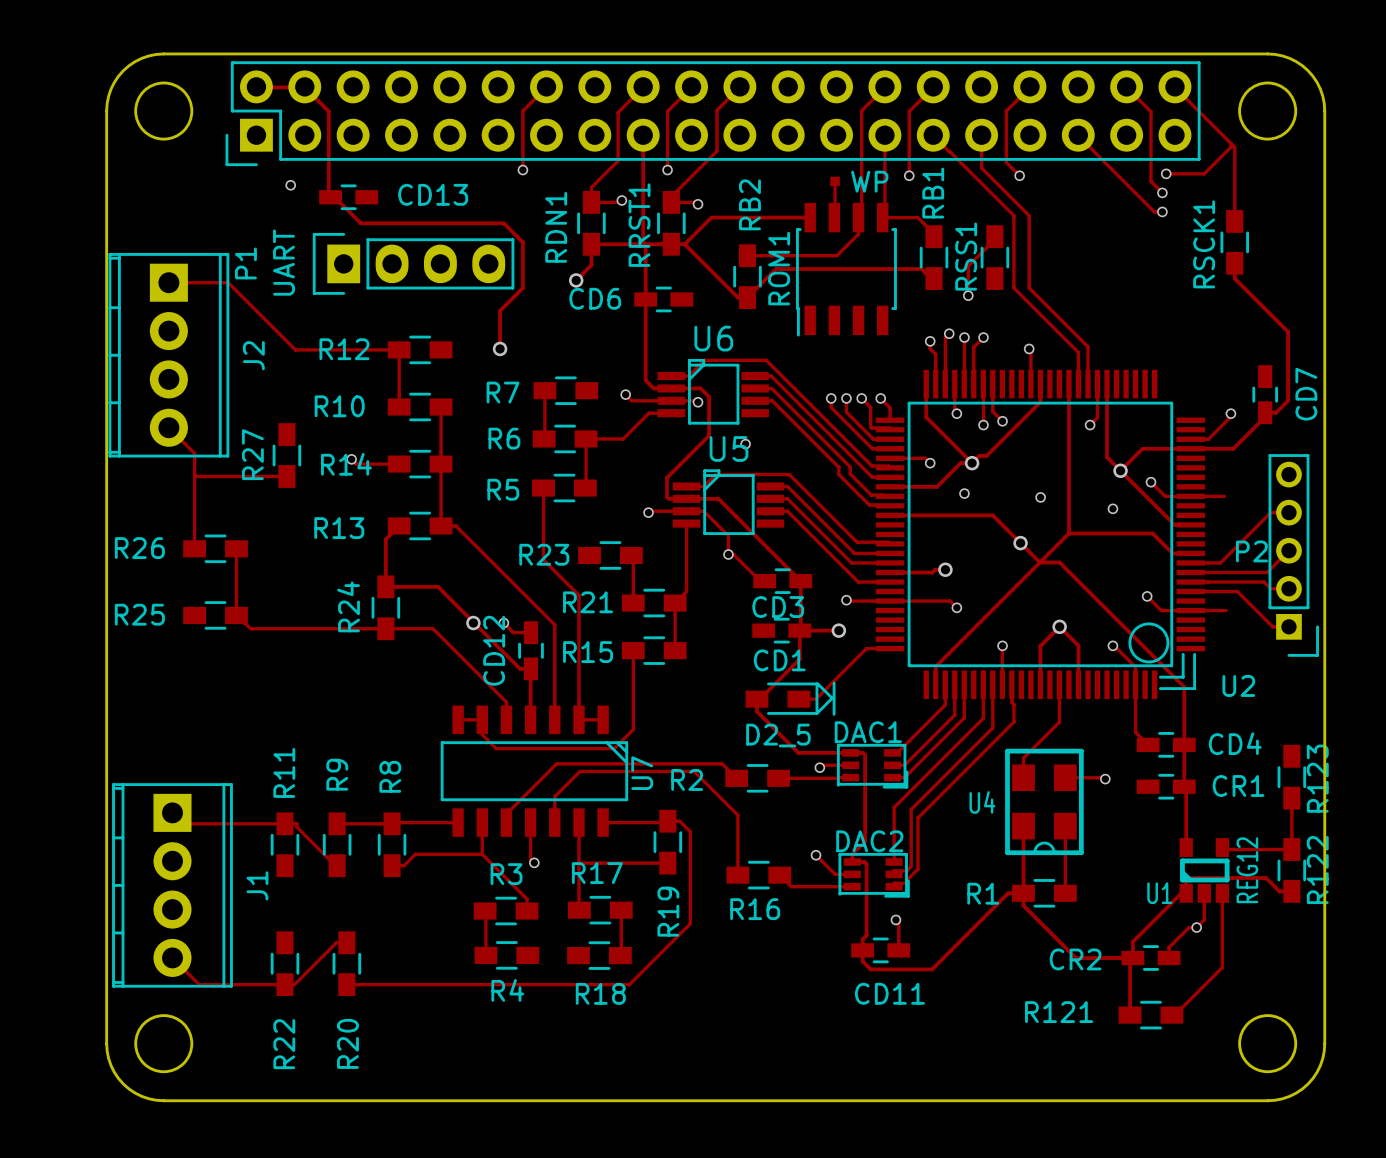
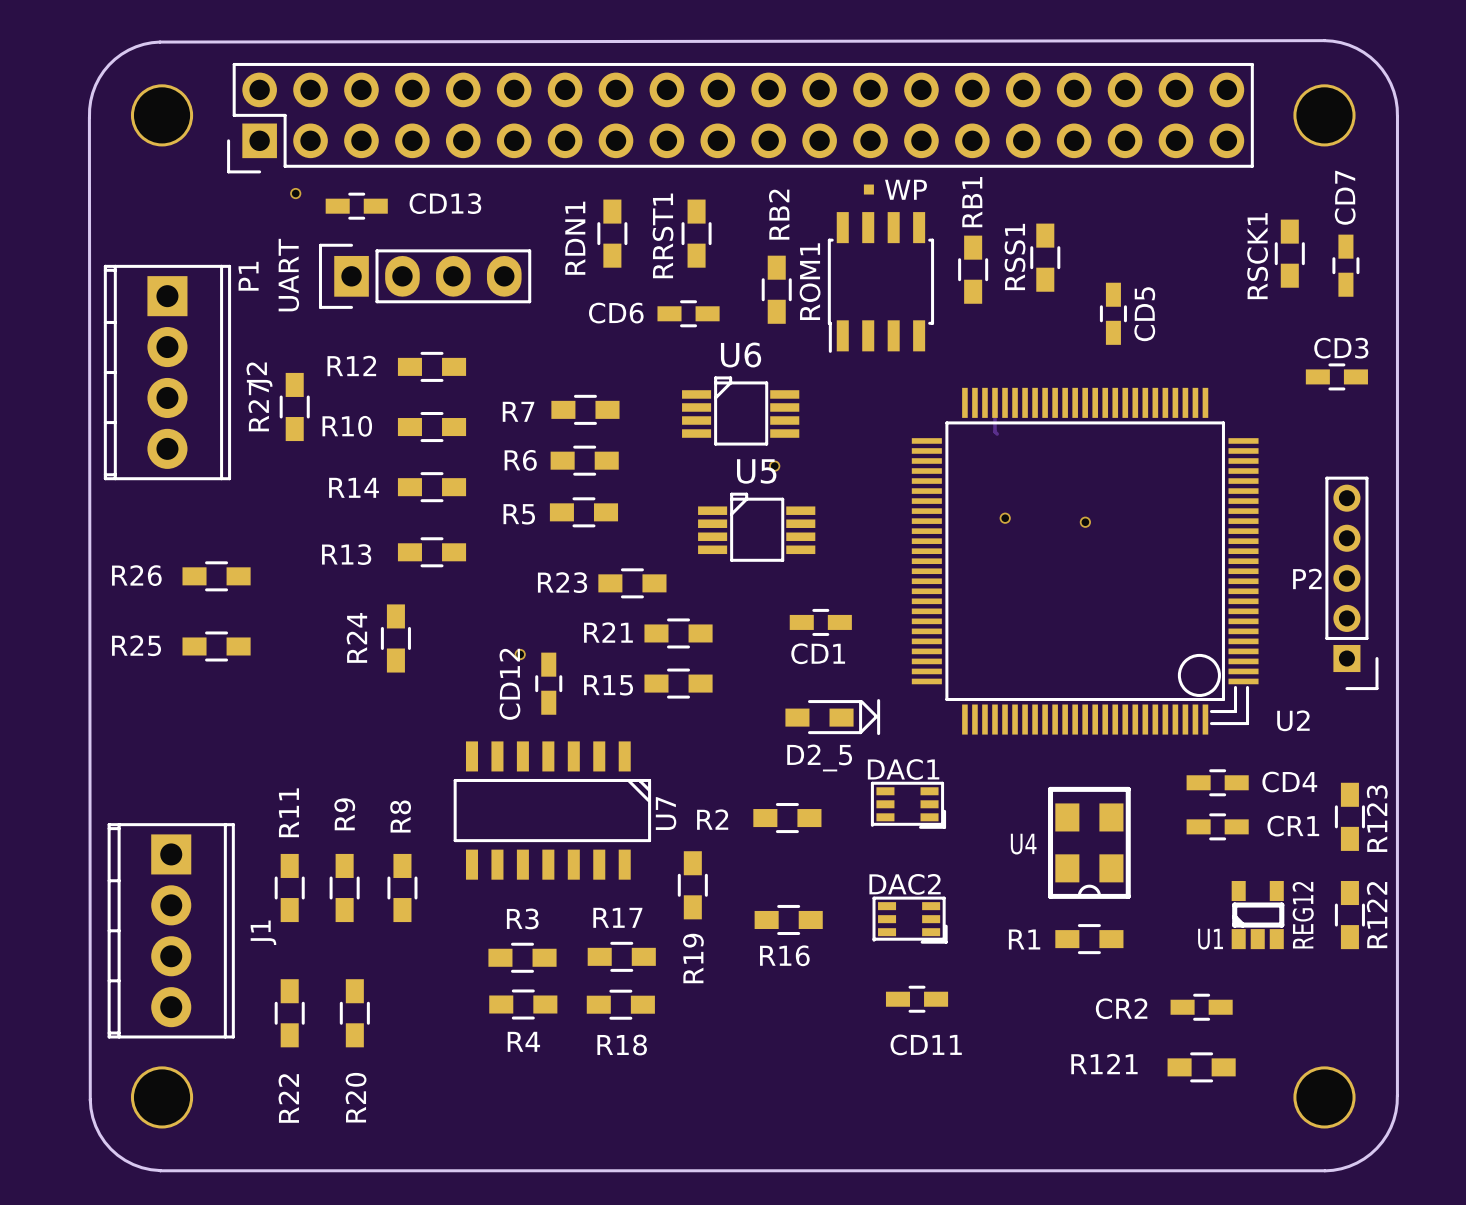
board edge: (163, 53) (1267, 53) (1289, 58) (1308, 70) (1320, 89) (1324, 111) (1324, 1043) (1320, 1065) (1308, 1084) (1289, 1096) (1267, 1100) (163, 1100) (141, 1096) (123, 1084) (111, 1065) (106, 1043) (106, 111) (111, 89) (123, 70) (141, 58) (163, 53) -> none
track: (256, 87) (304, 87) (328, 111) (328, 195) (334, 197) (360, 223) (503, 223) (522, 242) (522, 288) (500, 310) (500, 348) -> none
track: (546, 87) (522, 111) (522, 170) -> none
track: (643, 87) (618, 112) (618, 160) (591, 187) (591, 202) (619, 202) (621, 200) -> none
track: (691, 87) (667, 111) (667, 170) -> none
track: (739, 87) (717, 110) (717, 151) (671, 196) (671, 202) (696, 202) (698, 204) -> none
track: (884, 87) (861, 110) (861, 214) (858, 217) (858, 234) (836, 255) (747, 255) -> none
track: (933, 87) (909, 111) (909, 175) -> none
track: (1029, 87) (1006, 111) (1006, 162) (1019, 175) -> none
track: (1126, 87) (1150, 111) (1150, 181) (1162, 192) -> none
track: (1174, 87) (1234, 147) (1234, 221) -> none
board edge: none -> (1397, 116) (1393, 91) (1386, 76) (1376, 63) (1356, 48) (1340, 42) (1324, 40) (159, 42) (143, 44) (121, 54) (109, 64) (99, 78) (92, 92) (89, 109) (90, 1100)
board edge: none -> (1397, 116) (1397, 1103) (1390, 1127) (1382, 1141) (1370, 1153) (1349, 1166) (1324, 1170)
track: (643, 135) (645, 380) (653, 388) (700, 388) (709, 396) (709, 435) (667, 477) (667, 496) (668, 498) (718, 498) (800, 581) (799, 630) -> none
track: (884, 135) (884, 215) (882, 217) (917, 217) (934, 233) (934, 236) -> none
track: (933, 135) (1013, 215) (1013, 288) (1078, 352) (1078, 384) -> none
track: (981, 135) (981, 168) (1029, 215) (1029, 288) (1088, 346) (1088, 384) -> none
track: (1078, 135) (1154, 211) (1162, 211) -> none
track: (1230, 143) (1230, 147) (1204, 173) (1166, 173) -> none
via: (522, 170) -> none
via: (667, 170) -> none
via: (1166, 173) -> none
via: (909, 175) -> none
via: (1019, 175) -> none
track: (835, 181) (834, 217) -> none
via: (1162, 192) -> none
via: (621, 200) -> none
via: (698, 204) -> none
via: (1162, 211) -> none
track: (810, 217) (711, 217) (684, 244) -> none
track: (994, 236) (994, 239) (968, 266) (968, 295) -> none
track: (684, 244) (737, 297) (747, 297) (776, 269) (921, 269) (934, 281) (934, 278) -> none
track: (684, 244) (591, 244) (591, 265) (576, 280) -> none
RSS1 position: (994, 257) -> (1045, 257)
track: (1234, 263) (1234, 278) (1288, 331) (1288, 400) (1276, 412) (1265, 412) (1265, 417) (1233, 448) (1142, 448) (1120, 470) -> none
via: (576, 280) -> none
track: (168, 282) (228, 282) (295, 349) (399, 349) (399, 407) -> none
via: (968, 295) -> none
CD5: none -> (1113, 313)
track: (949, 333) (945, 337) (945, 383) -> none
via: (949, 333) -> none
track: (964, 337) (964, 383) -> none
via: (964, 337) -> none
track: (983, 337) (973, 347) (973, 384) -> none
via: (983, 337) -> none
track: (930, 341) (930, 348) (935, 354) (935, 384) -> none
via: (930, 341) -> none
via: (500, 348) -> none
track: (1029, 348) (1030, 350) (1030, 384) -> none
via: (1029, 348) -> none
track: (671, 376) (688, 376) (704, 360) (766, 360) (872, 466) (888, 466) (890, 467) -> none
track: (755, 376) (771, 376) (872, 477) (890, 477) -> none
track: (926, 384) (926, 417) (972, 463) -> none
track: (983, 384) (983, 425) -> none
track: (992, 384) (992, 411) (1002, 421) -> none
track: (1040, 384) (1040, 402) (986, 455) (979, 455) (972, 463) -> none
track: (1068, 384) (1068, 533) -> none
track: (1097, 384) (1097, 417) (1090, 425) -> none
track: (1107, 384) (1107, 457) (1174, 524) (1190, 524) -> none
track: (755, 388) (771, 388) (850, 466) (850, 474) (871, 495) (890, 496) -> none
track: (544, 390) (544, 438) -> none
track: (625, 394) (631, 400) (698, 402) -> none
via: (625, 394) -> none
CD7 position: (1265, 394) -> (1345, 265)
CD7 name position: CD7 (1306, 394) -> CD7 (1345, 197)
track: (831, 398) (831, 407) (872, 448) (890, 448) -> none
via: (831, 398) -> none
track: (846, 398) (846, 412) (873, 439) (890, 439) -> none
via: (846, 398) -> none
track: (861, 398) (870, 407) (870, 426) (890, 427) (890, 429) -> none
via: (861, 398) -> none
track: (880, 398) (890, 407) (890, 420) -> none
via: (880, 398) -> none
track: (755, 400) (772, 400) (838, 466) (838, 474) (869, 505) (890, 505) -> none
via: (698, 402) -> none
track: (441, 407) (441, 525) (455, 525) (554, 624) (554, 719) -> none
track: (671, 413) (649, 413) (623, 438) (586, 438) (585, 488) -> none
via: (956, 413) -> none
track: (1230, 413) (1230, 416) (1208, 439) (1190, 439) -> none
via: (1230, 413) -> none
via: (1002, 421) -> none
via: (983, 425) -> none
via: (1090, 425) -> none
track: (168, 427) (194, 453) (194, 548) -> none
R27 position: (286, 455) -> (294, 406)
track: (890, 458) (925, 458) (930, 463) -> none
track: (351, 459) (356, 464) (399, 464) -> none
via: (351, 459) -> none
via: (930, 463) -> none
track: (972, 463) (960, 463) (936, 486) (890, 486) -> none
via: (972, 463) -> none
via: (1120, 470) -> none
track: (194, 474) (196, 476) (286, 476) -> none
track: (1150, 482) (1165, 496) (1224, 496) -> none
via: (1150, 482) -> none
track: (686, 486) (703, 486) (715, 474) (789, 474) (856, 542) (888, 542) (890, 543) -> none
track: (770, 486) (787, 486) (854, 553) (890, 553) -> none
track: (543, 488) (543, 559) (578, 595) (578, 719) (603, 719) -> none
track: (770, 498) (787, 498) (851, 562) (890, 562) -> none
via: (1112, 508) -> none
track: (770, 511) (787, 511) (858, 582) (890, 582) -> none
track: (648, 512) (703, 511) (728, 535) (728, 554) (733, 554) (760, 581) (764, 581) -> none
via: (648, 512) -> none
track: (1288, 512) (1270, 512) (1220, 562) (1190, 562) -> none
track: (890, 515) (992, 515) (1039, 562) (1059, 562) (1184, 687) (1186, 847) -> none
track: (686, 523) (686, 591) (675, 603) (675, 650) -> none
track: (399, 525) (385, 539) (385, 586) (438, 586) (474, 623) -> none
track: (1068, 533) (1152, 533) (1172, 553) (1190, 553) -> none
track: (1068, 533) (935, 666) (935, 684) -> none
via: (1020, 543) -> none
track: (236, 548) (236, 615) (250, 628) (433, 628) (506, 702) (506, 719) -> none
track: (1288, 550) (1267, 572) (1190, 572) -> none
via: (728, 554) -> none
track: (631, 555) (633, 557) (633, 603) -> none
track: (945, 569) (935, 569) (932, 572) (890, 572) -> none
via: (945, 569) -> none
CD3 position: (782, 581) -> (1336, 376)
track: (1190, 582) (1264, 582) (1270, 588) (1288, 588) -> none
track: (1190, 591) (1237, 591) (1272, 626) (1288, 626) -> none
track: (1147, 596) (1161, 610) (1226, 610) -> none
via: (1147, 596) -> none
track: (846, 600) (950, 601) (956, 607) -> none
via: (846, 600) -> none
CD3 name position: CD3 (778, 607) -> CD3 (1341, 348)
via: (956, 607) -> none
via: (473, 623) -> none
track: (474, 623) (520, 668) (531, 668) (530, 719) -> none
track: (503, 623) (513, 632) (531, 632) -> none
via: (1059, 626) -> none
CD1 position: (781, 630) -> (820, 622)
track: (799, 630) (838, 630) -> none
track: (799, 630) (799, 659) (759, 699) (757, 699) (757, 711) (798, 752) (863, 752) (865, 754) (865, 841) (852, 854) (852, 861) (864, 861) (866, 863) (866, 935) (862, 939) (862, 961) (870, 969) (932, 969) (1008, 893) (1023, 893) -> none
via: (838, 630) -> none
via: (1002, 645) -> none
track: (1112, 645) (1135, 667) (1135, 732) (1148, 744) -> none
via: (1112, 645) -> none
track: (1002, 646) (1002, 684) -> none
track: (890, 648) (866, 648) (816, 699) (798, 699) -> none
track: (633, 650) (633, 729) (614, 748) (496, 748) (482, 734) (482, 719) (458, 719) -> none
track: (945, 684) (945, 705) (897, 752) (892, 752) -> none
track: (954, 684) (954, 715) (904, 765) (892, 765) -> none
track: (964, 684) (964, 717) (904, 777) (892, 777) -> none
track: (983, 684) (983, 718) (894, 807) (894, 861) -> none
track: (992, 684) (992, 727) (911, 809) (911, 866) (906, 870) (894, 870) (894, 874) -> none
track: (1011, 684) (1013, 722) (917, 818) (917, 869) (907, 877) (906, 883) (894, 883) (894, 886) -> none
track: (1040, 684) (1040, 646) (1059, 626) (1078, 645) (1078, 684) -> none
track: (1059, 684) (1059, 722) (1023, 758) (1023, 777) -> none
D2_5 position: (790, 698) -> (832, 717)
track: (850, 765) (822, 765) (819, 767) -> none
via: (819, 767) -> none
track: (850, 777) (778, 778) -> none
track: (1065, 777) (1105, 779) -> none
track: (736, 778) (722, 763) (556, 763) (506, 814) (506, 822) -> none
via: (1105, 779) -> none
track: (1291, 798) (1291, 849) (1224, 849) (1222, 847) -> none
track: (172, 812) (183, 823) (296, 823) (296, 827) (337, 865) -> none
track: (458, 822) (337, 823) -> none
track: (482, 822) (482, 854) -> none
track: (530, 822) (530, 859) (534, 862) -> none
track: (554, 822) (554, 796) (580, 771) (694, 771) (737, 815) (737, 875) -> none
track: (578, 822) (579, 910) -> none
track: (603, 822) (679, 821) (690, 831) (690, 923) (629, 984) (346, 984) -> none
track: (1023, 826) (1023, 905) (1075, 958) (1132, 958) -> none
track: (1065, 826) (1065, 893) -> none
track: (482, 854) (415, 854) (404, 865) (392, 865) -> none
track: (482, 854) (527, 899) (527, 911) -> none
track: (816, 855) (835, 874) (852, 874) -> none
via: (816, 855) -> none
via: (534, 862) -> none
track: (578, 862) (667, 863) -> none
track: (779, 875) (791, 886) (852, 886) -> none
track: (1291, 891) (1279, 891) (1266, 878) (1188, 878) (1186, 879) (1186, 893) (1181, 893) (1132, 941) (1132, 958) -> none
track: (1204, 893) (1204, 919) (1196, 927) (1189, 927) (1169, 947) (1169, 958) -> none
track: (1222, 893) (1222, 967) (1174, 1015) (1171, 1015) -> none
track: (621, 910) (620, 955) -> none
track: (485, 911) (485, 955) -> none
track: (895, 919) (898, 922) (898, 950) -> none
via: (895, 919) -> none
via: (1196, 927) -> none
track: (346, 942) (336, 942) (294, 984) (199, 984) (172, 957) -> none
track: (1132, 958) (1130, 960) (1130, 1015) -> none
board edge: none -> (90, 1099) (95, 1126) (110, 1149) (133, 1164) (159, 1170)
board edge: none -> (160, 1170) (1324, 1170)

